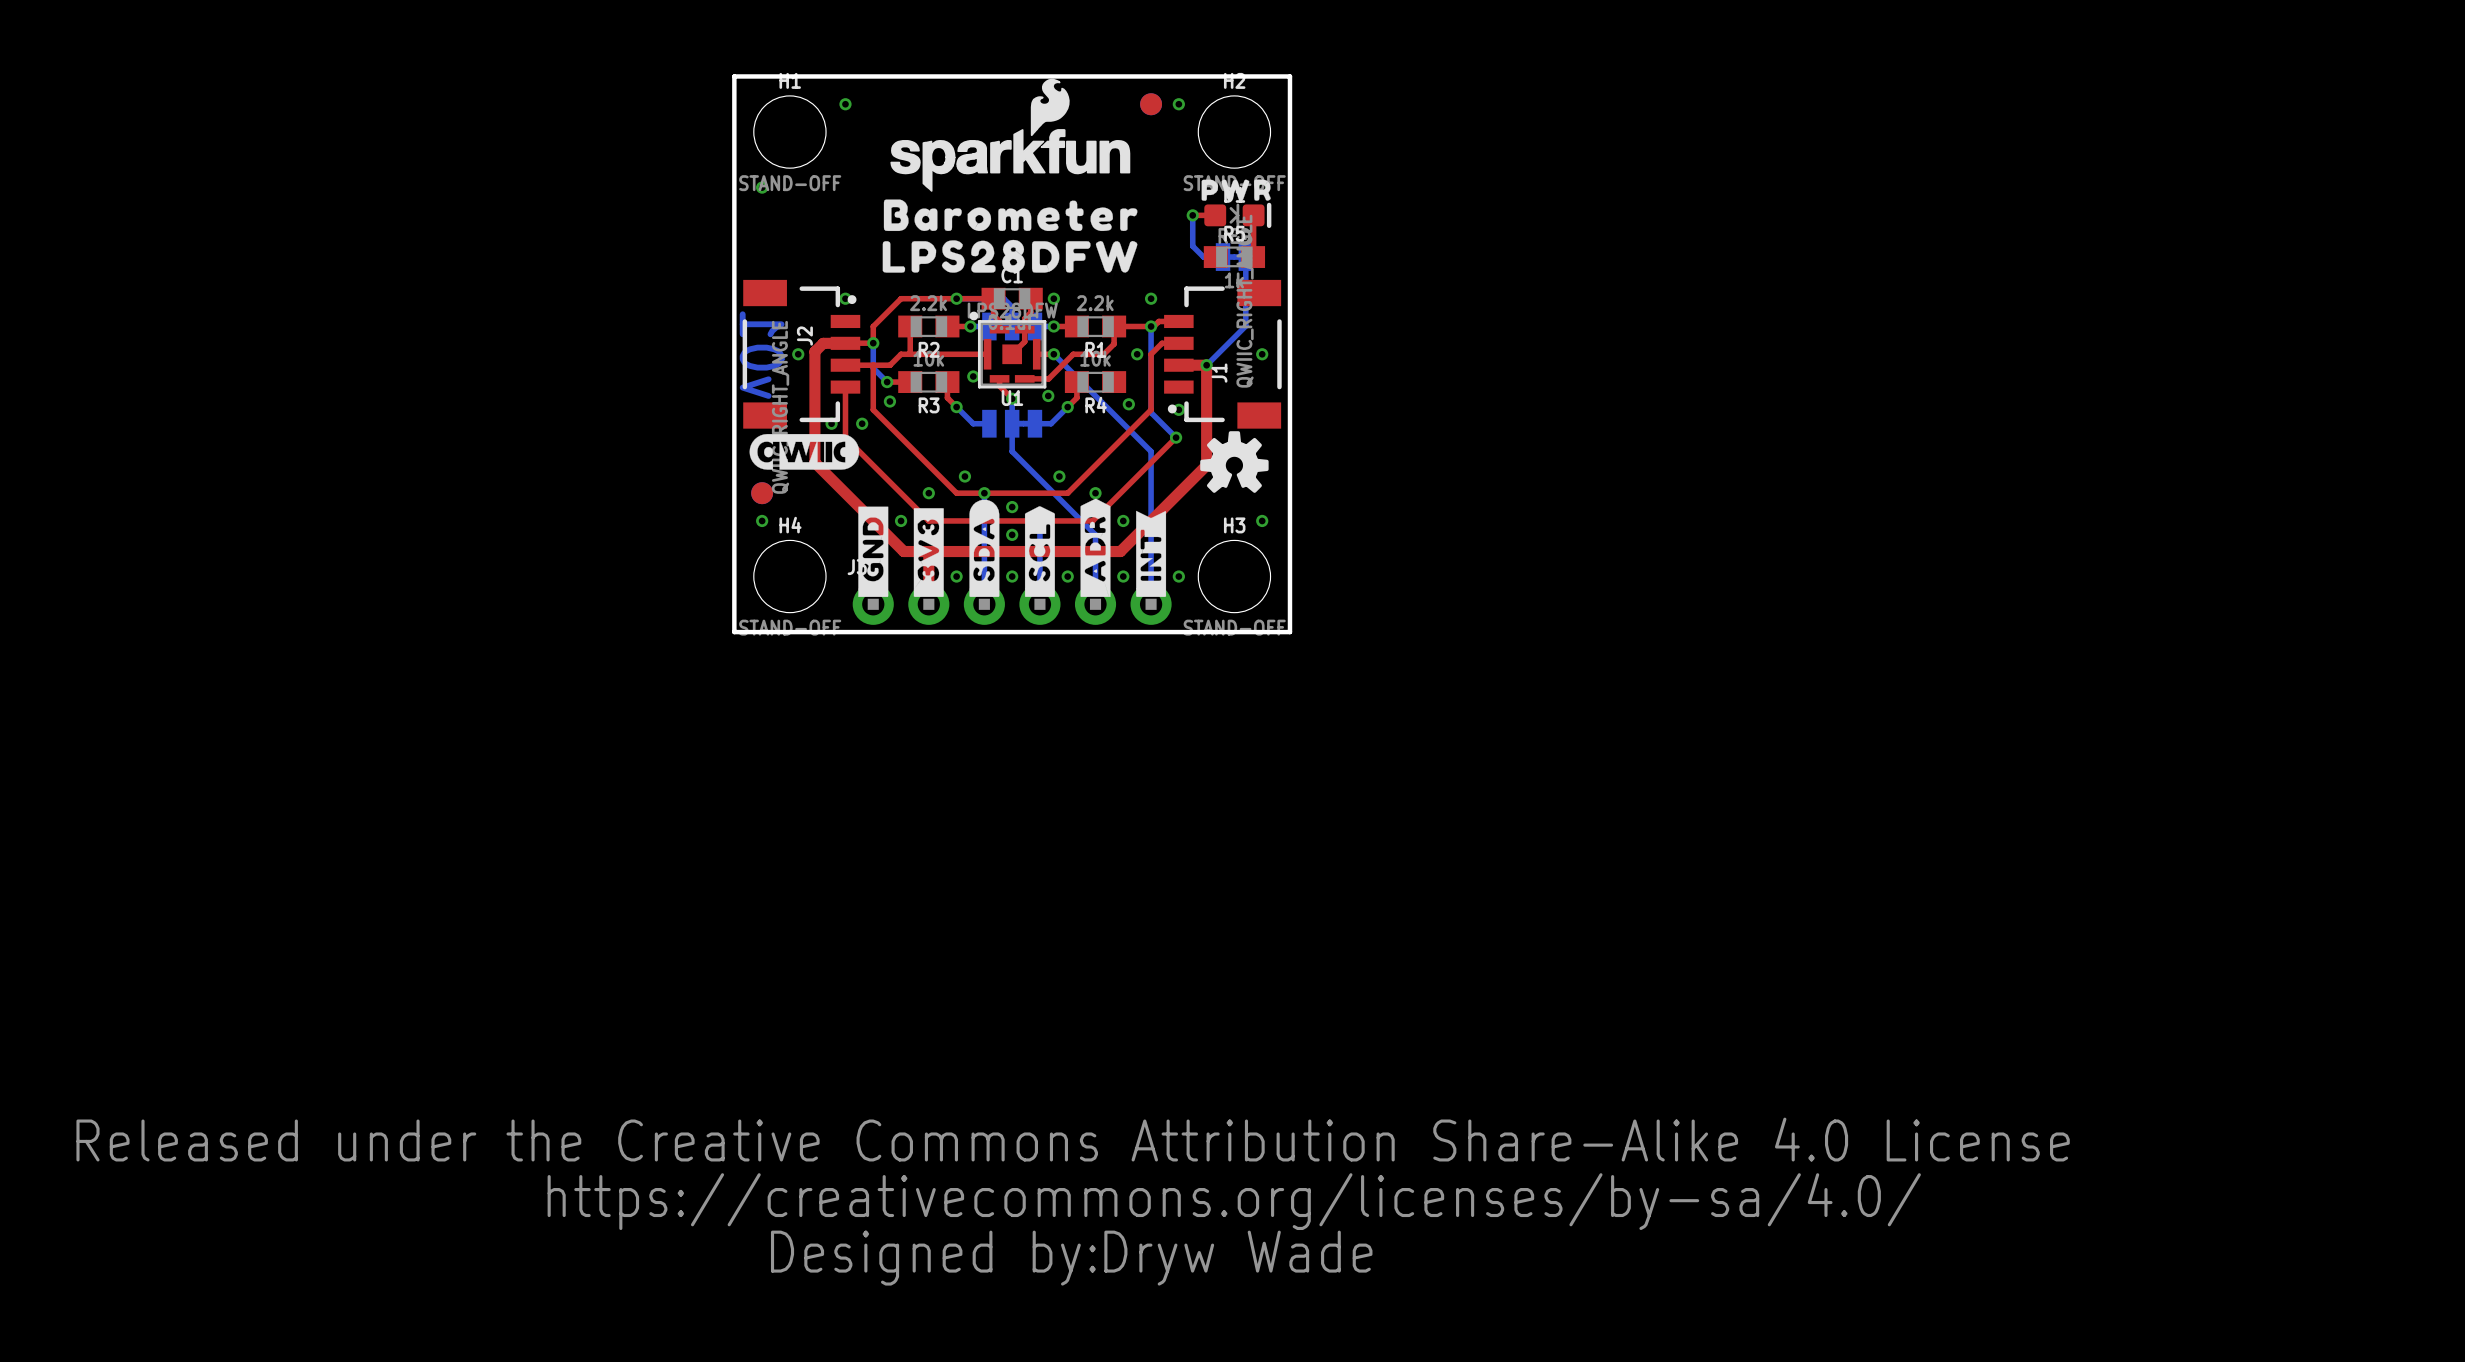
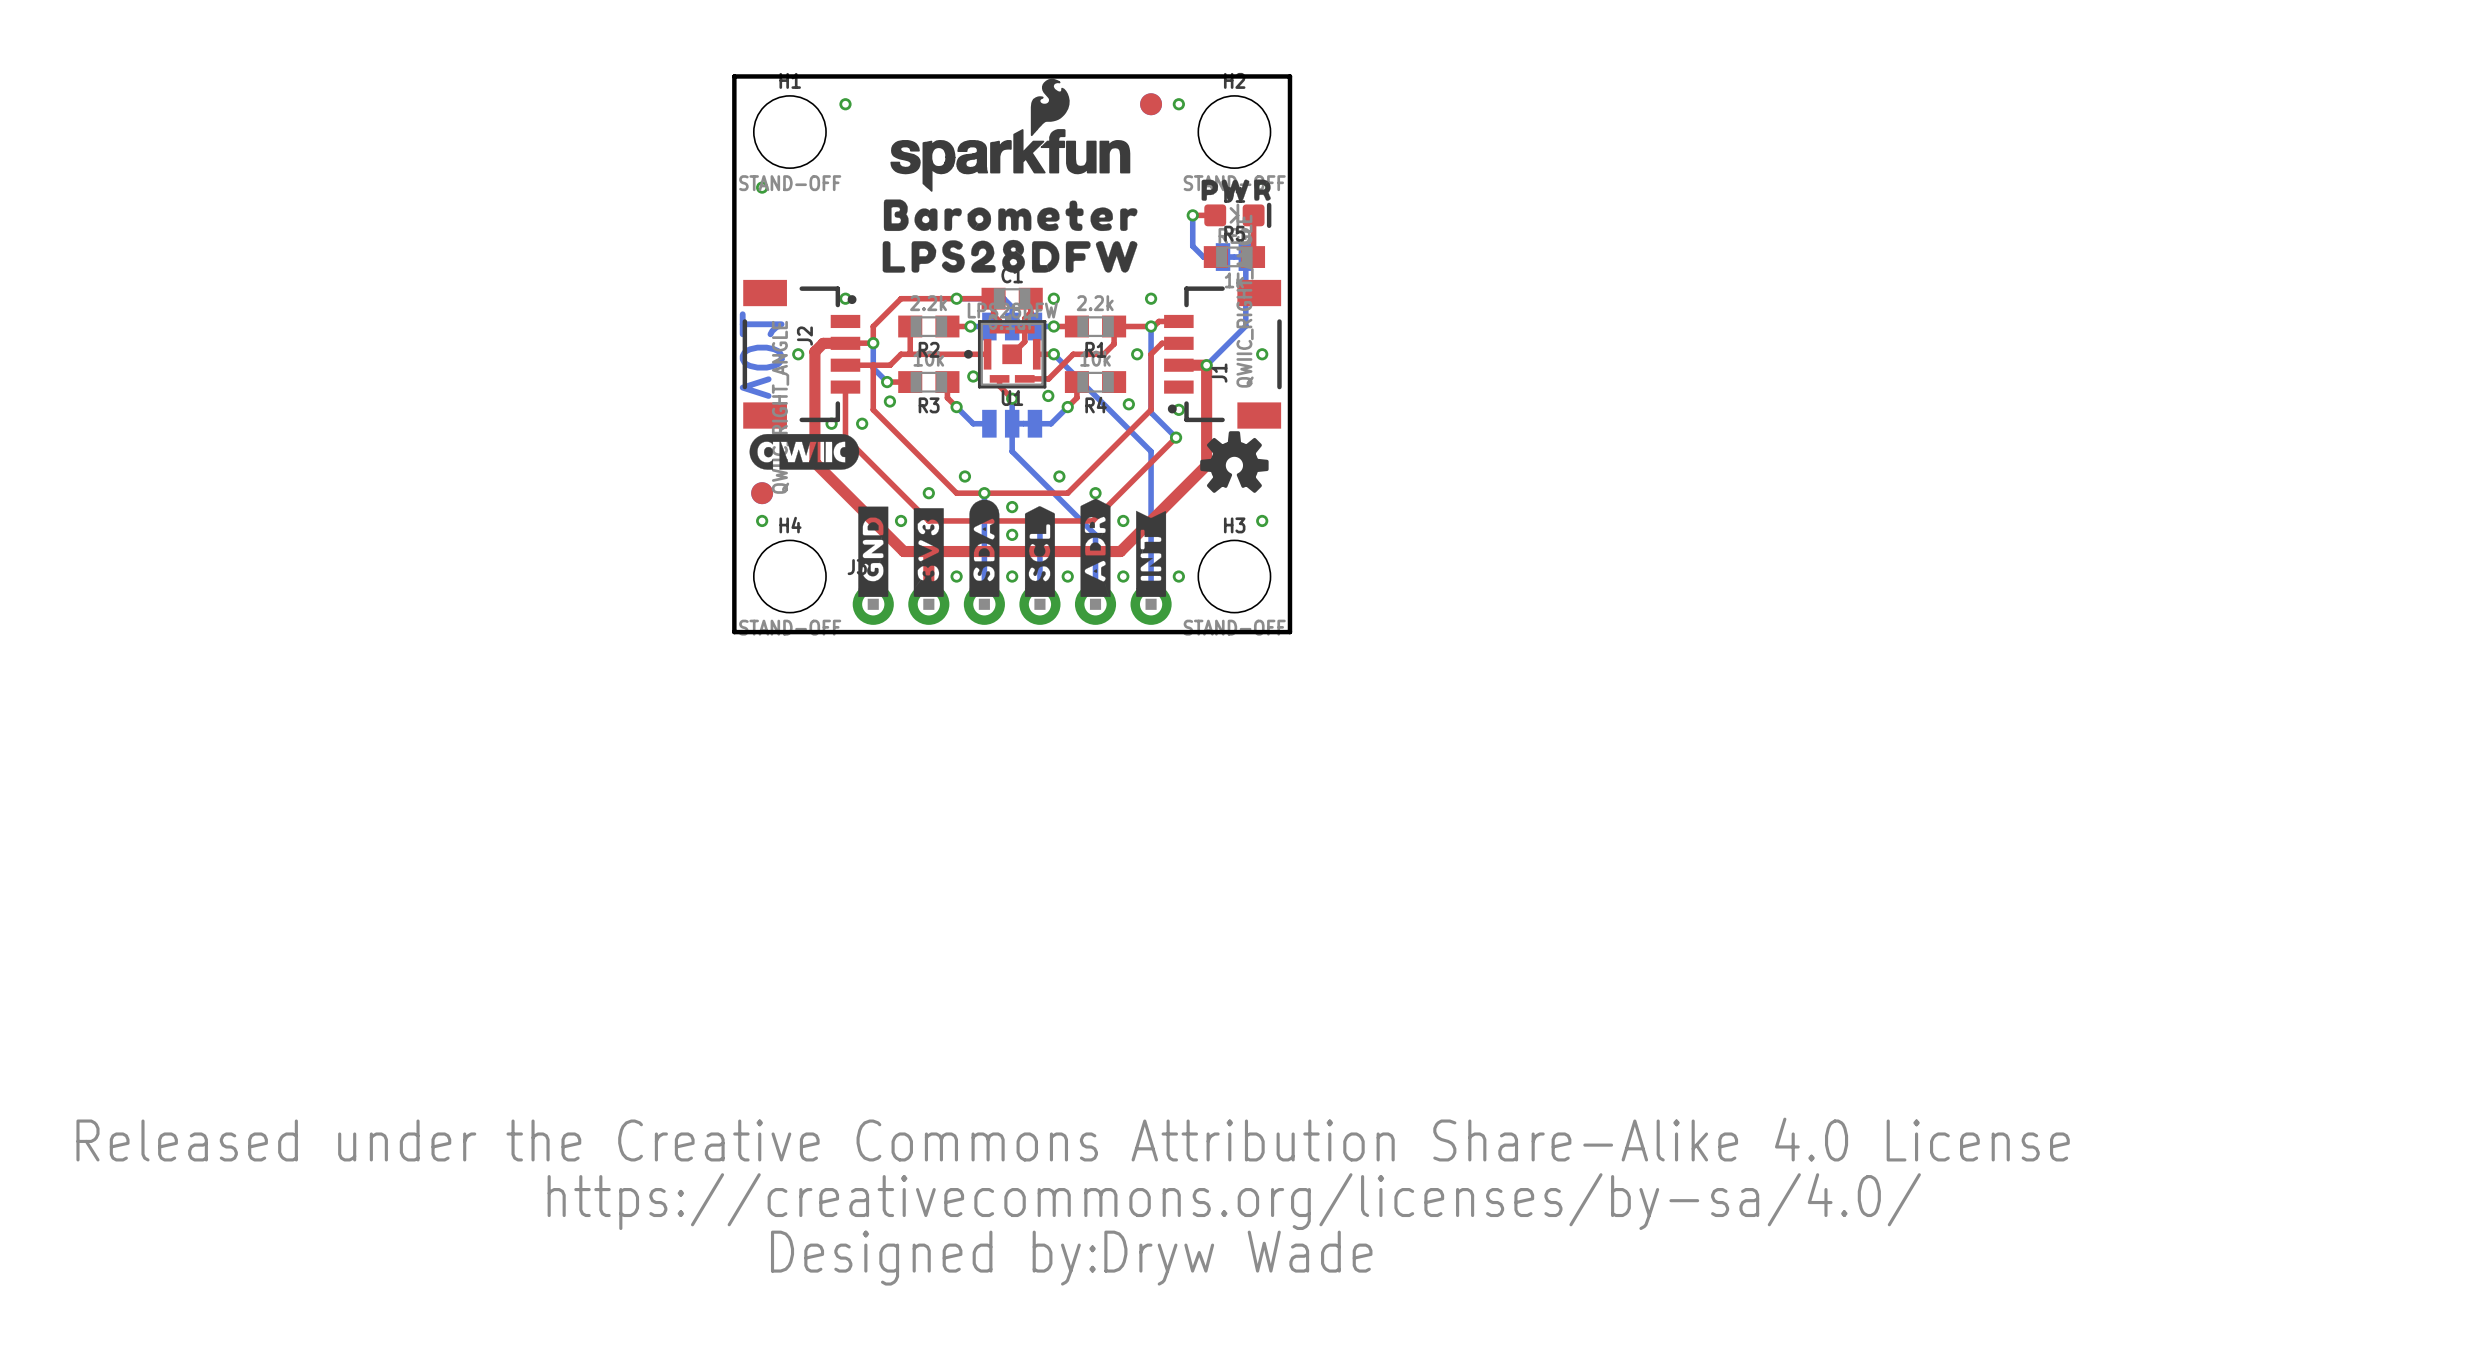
U1 footprint: [969, 311, 1047, 389] -> [964, 320, 1047, 389]

